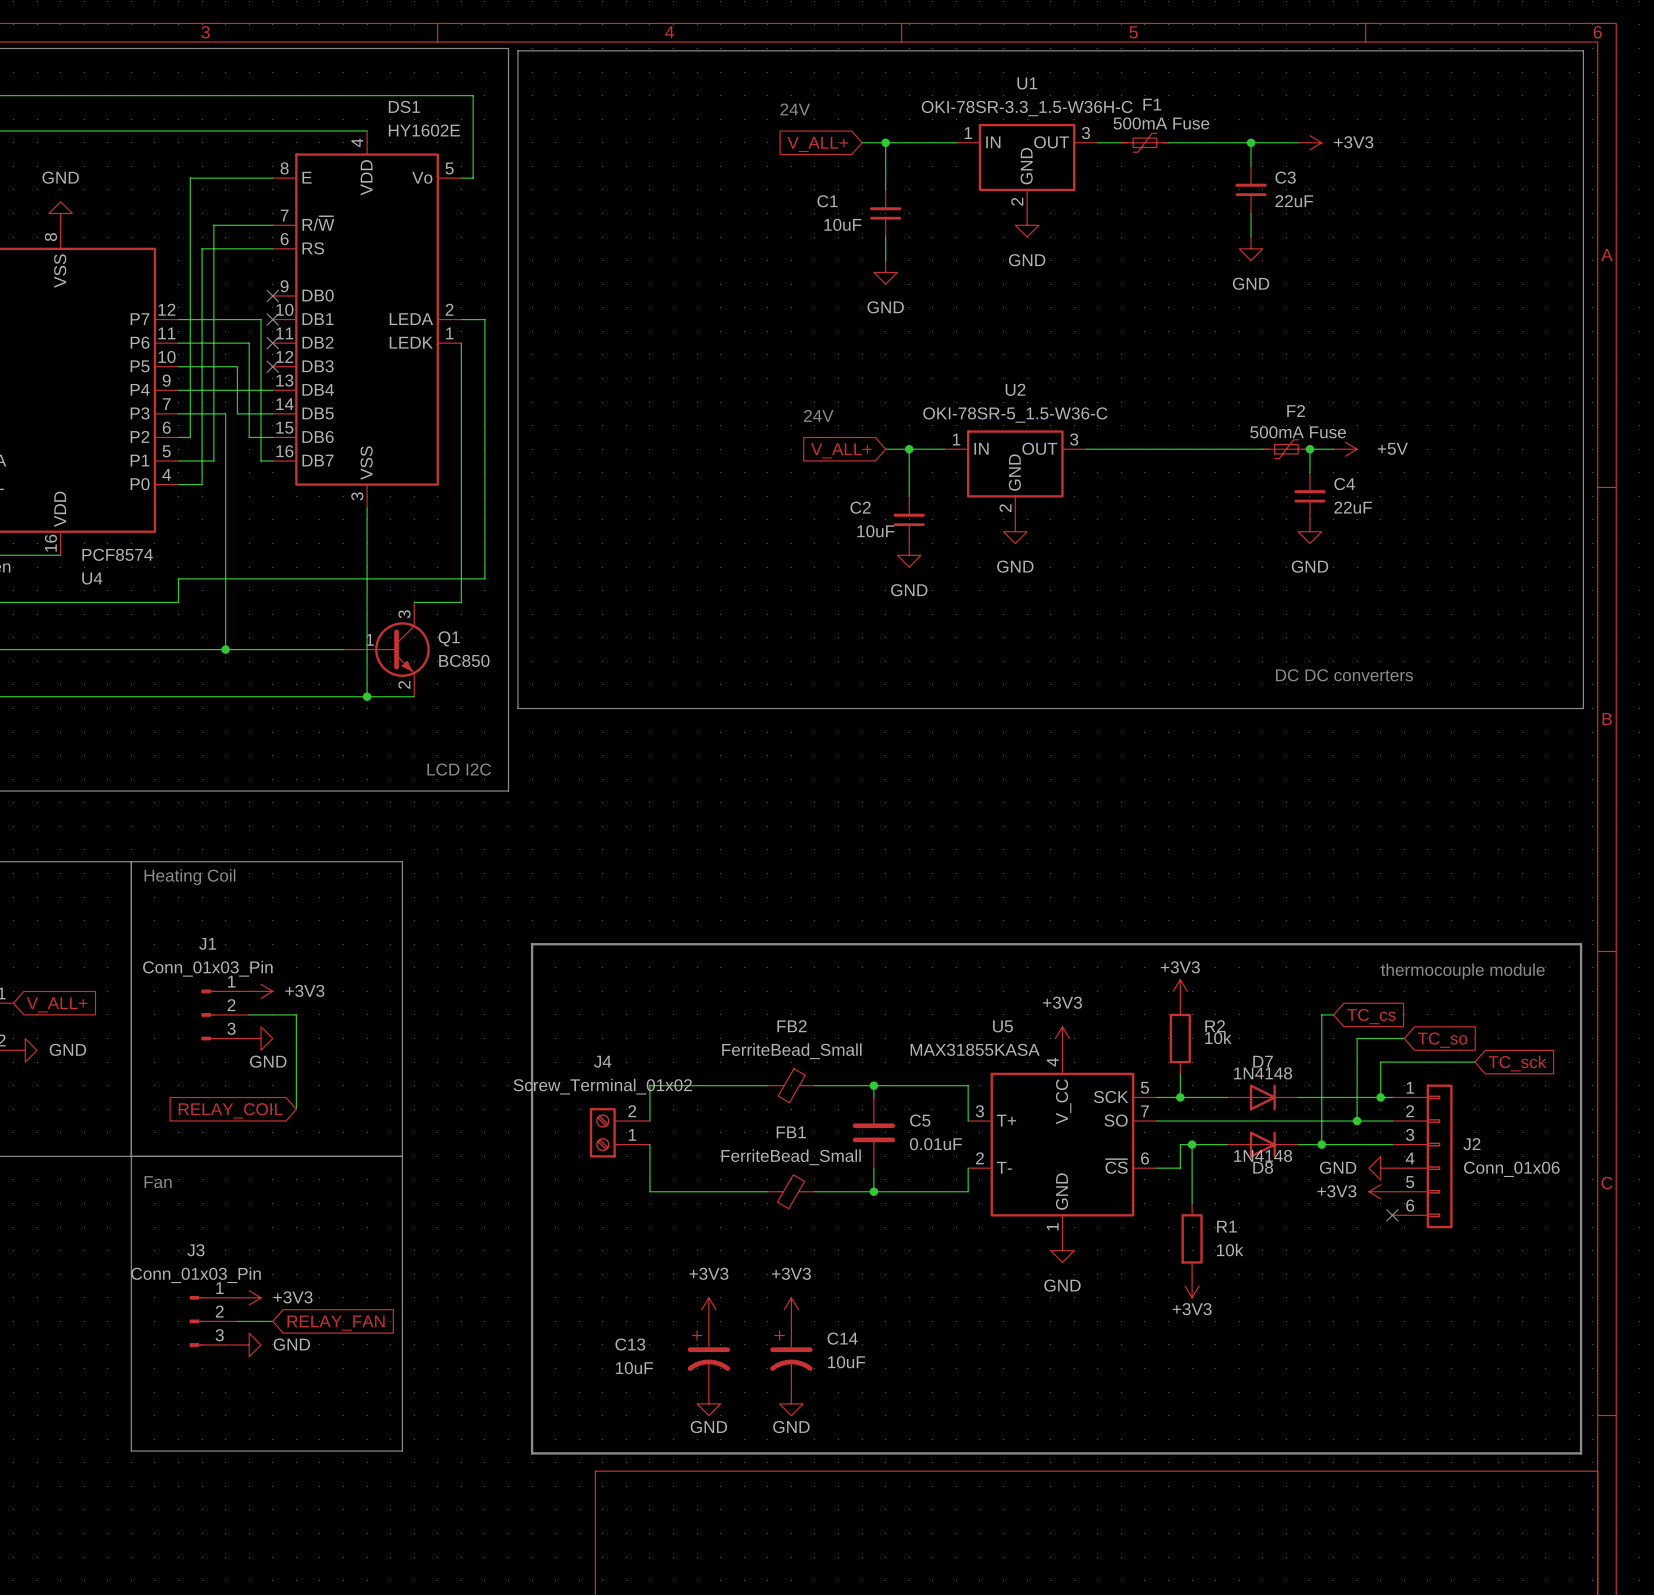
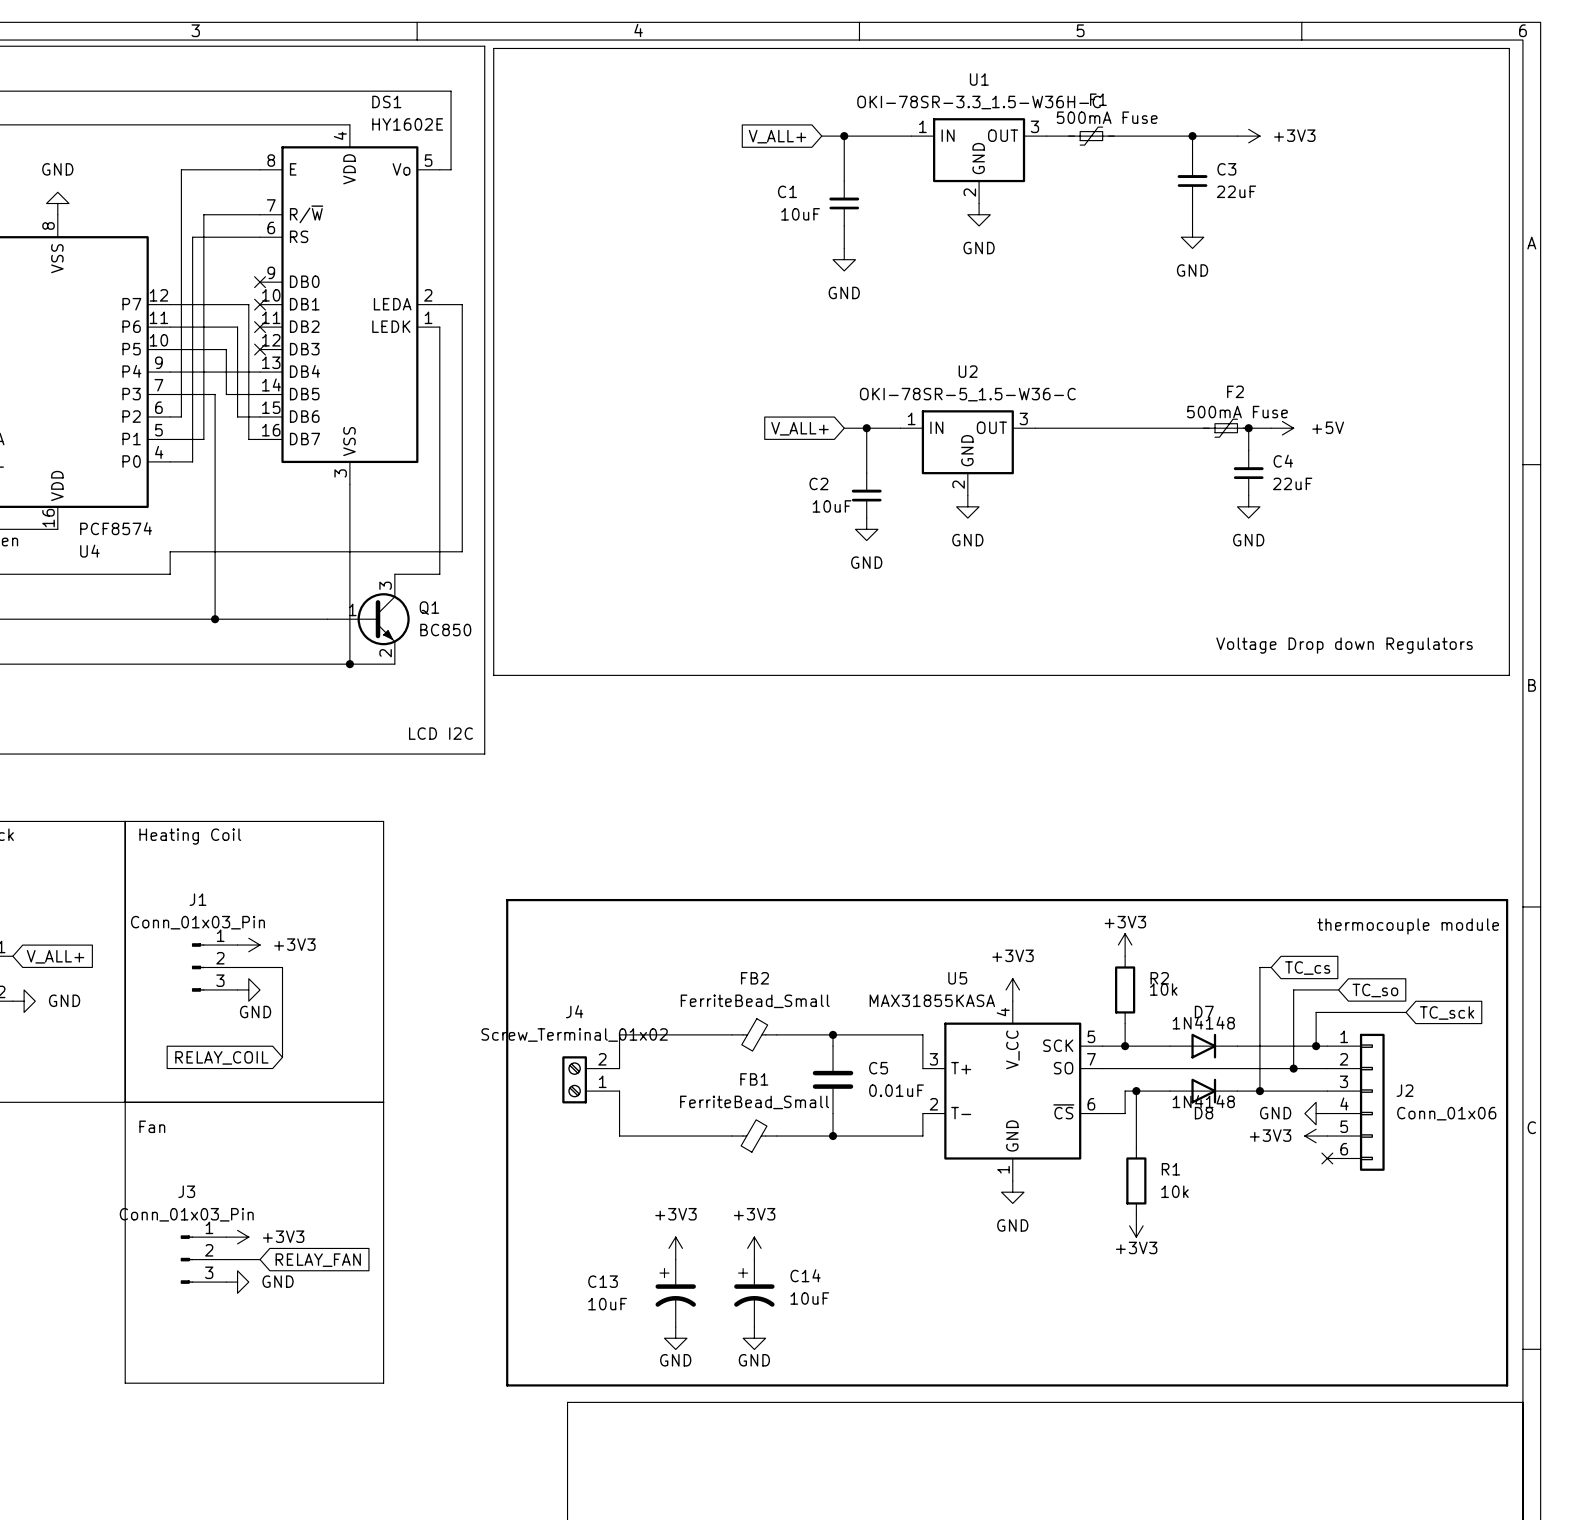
text: 24V (795, 109) -> none
text: 24V (818, 415) -> none
text: DC DC converters (1344, 675) -> Voltage Drop down Regulators (1344, 645)

